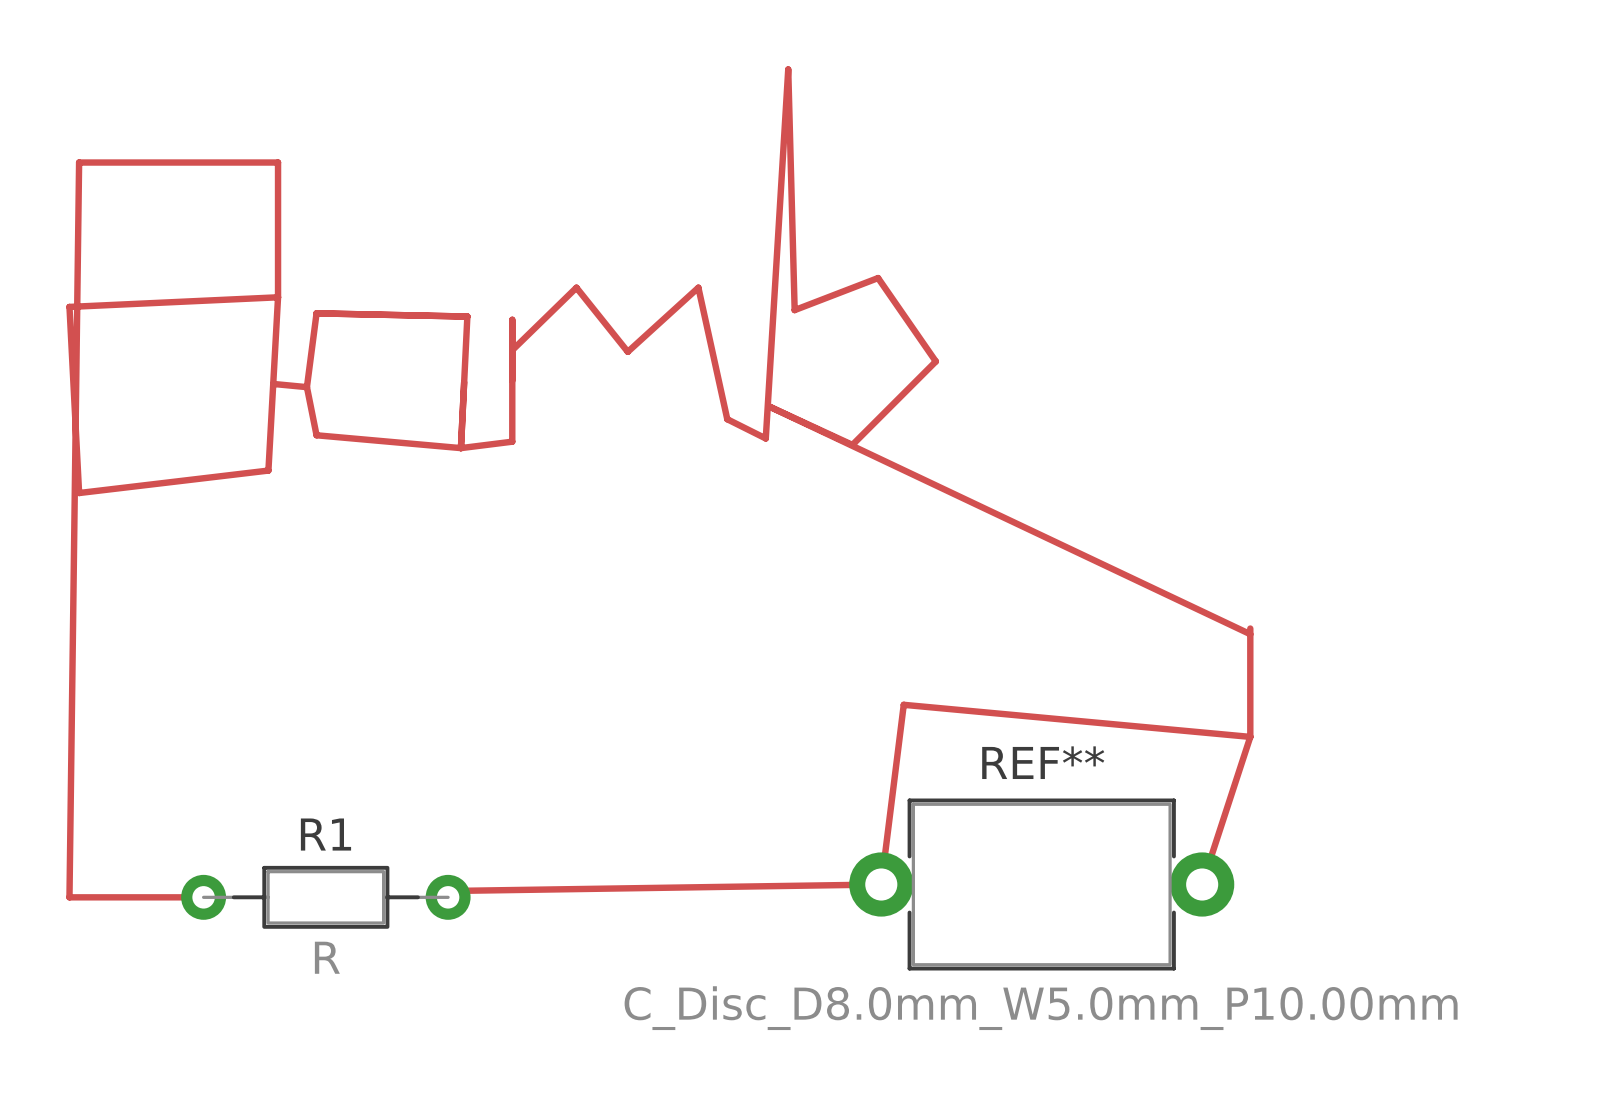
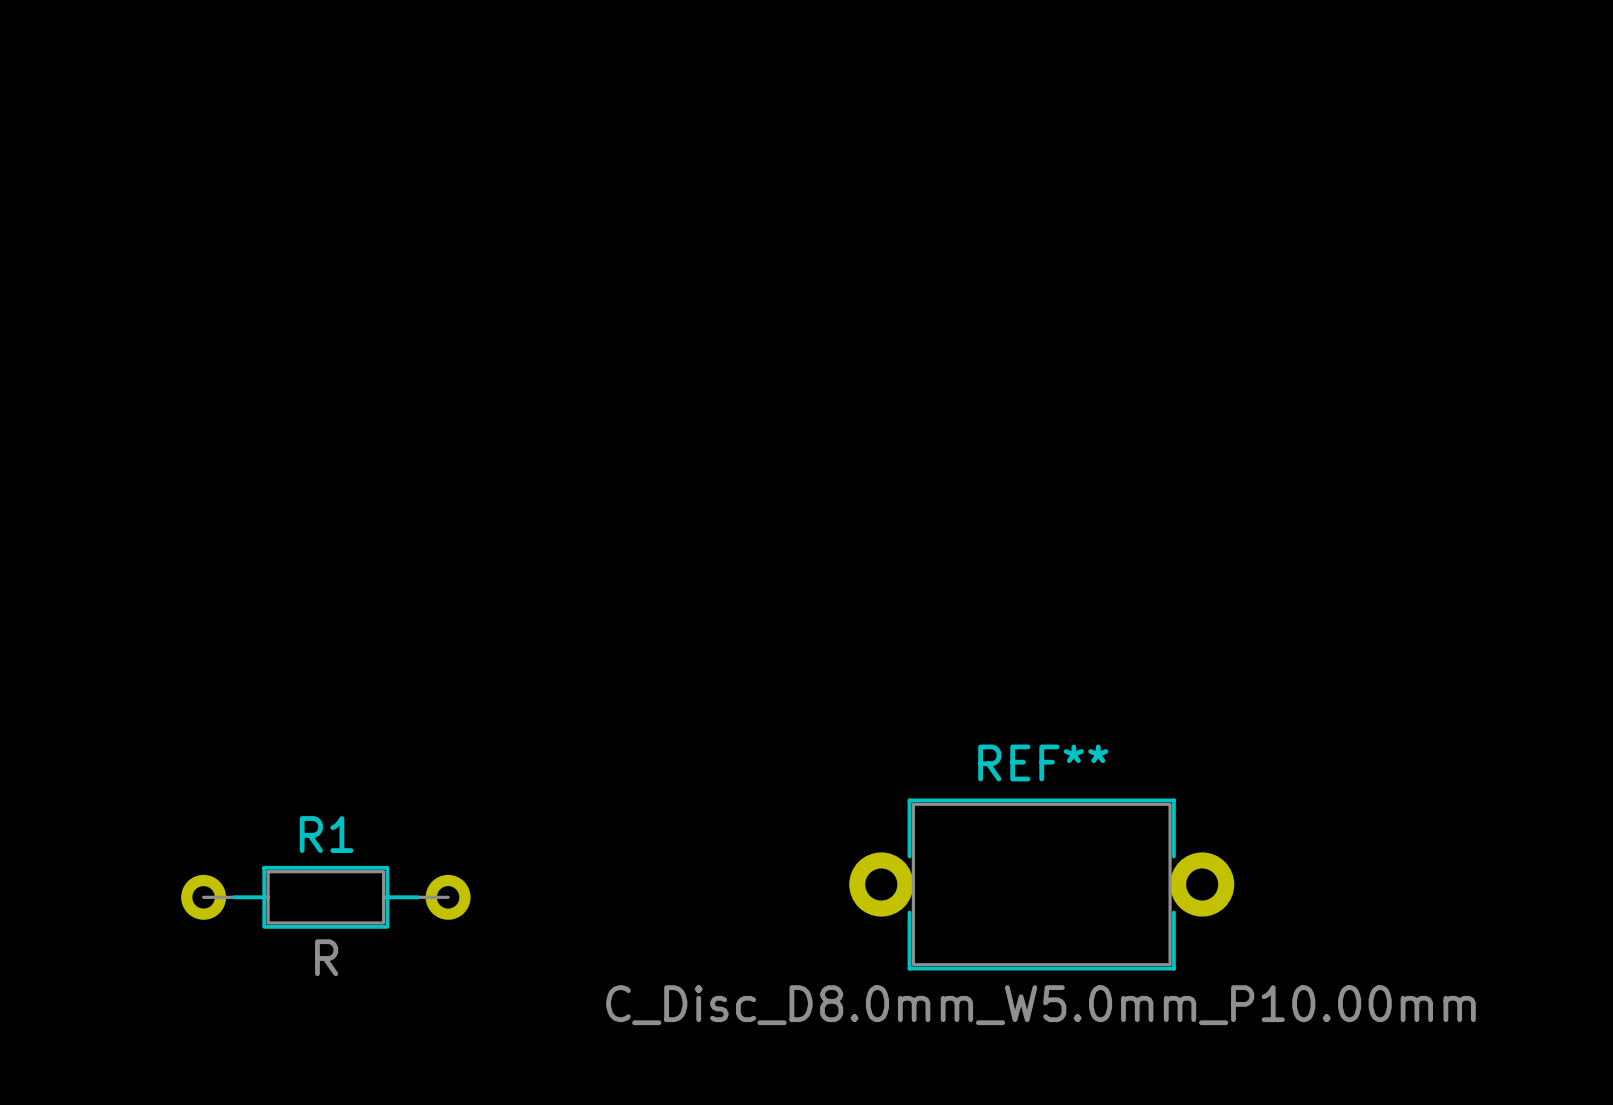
top track: (278, 297) (268, 470) (79, 493) (69, 306) (278, 297) -> none
top track: (278, 297) (278, 162) (79, 162) (69, 897) (203, 897) -> none
top track: (512, 319) (512, 441) (460, 448) -> none
top track: (512, 350) (576, 287) (627, 351) (698, 287) (727, 419) (765, 438) (788, 69) (794, 310) (878, 278) (935, 361) (852, 444) (768, 406) (1250, 634) -> none
top track: (273, 383) (306, 387) -> none
top track: (306, 387) (316, 313) (467, 316) (460, 448) -> none
top track: (306, 387) (316, 435) (460, 448) -> none
top track: (1250, 628) (1250, 736) -> none
top track: (1250, 736) (903, 704) (881, 884) (454, 890) -> none
top track: (1250, 736) (1198, 894) -> none

